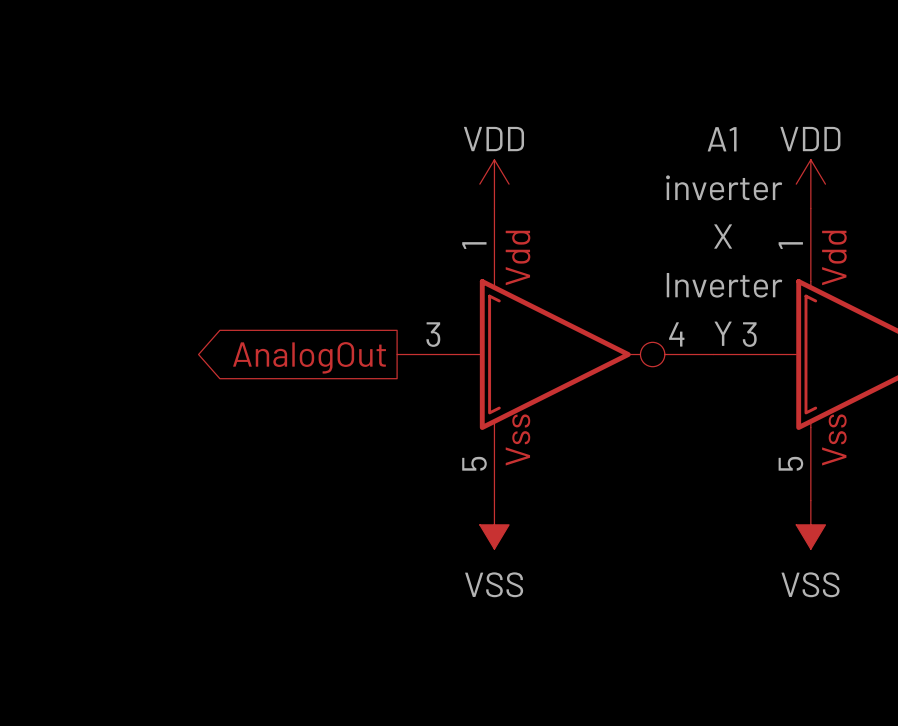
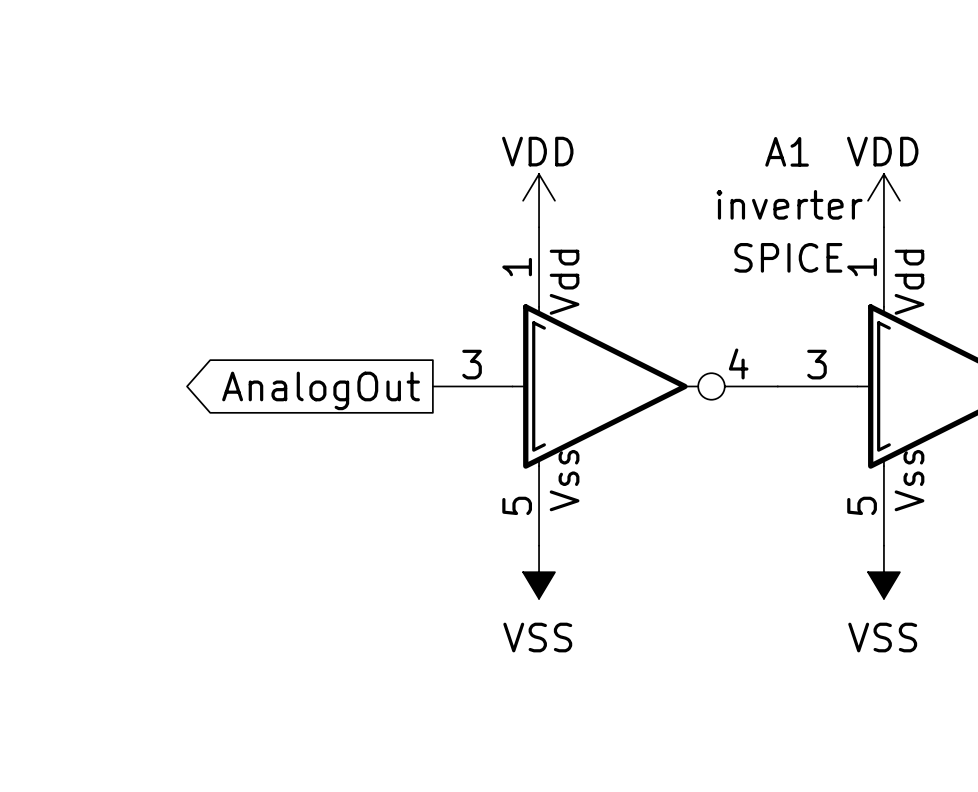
A1 text: none -> SPICE (788, 257)
A1 text: X (723, 236) -> none
A1 text: Inverter (724, 285) -> none
A1 text: Y (723, 333) -> none

